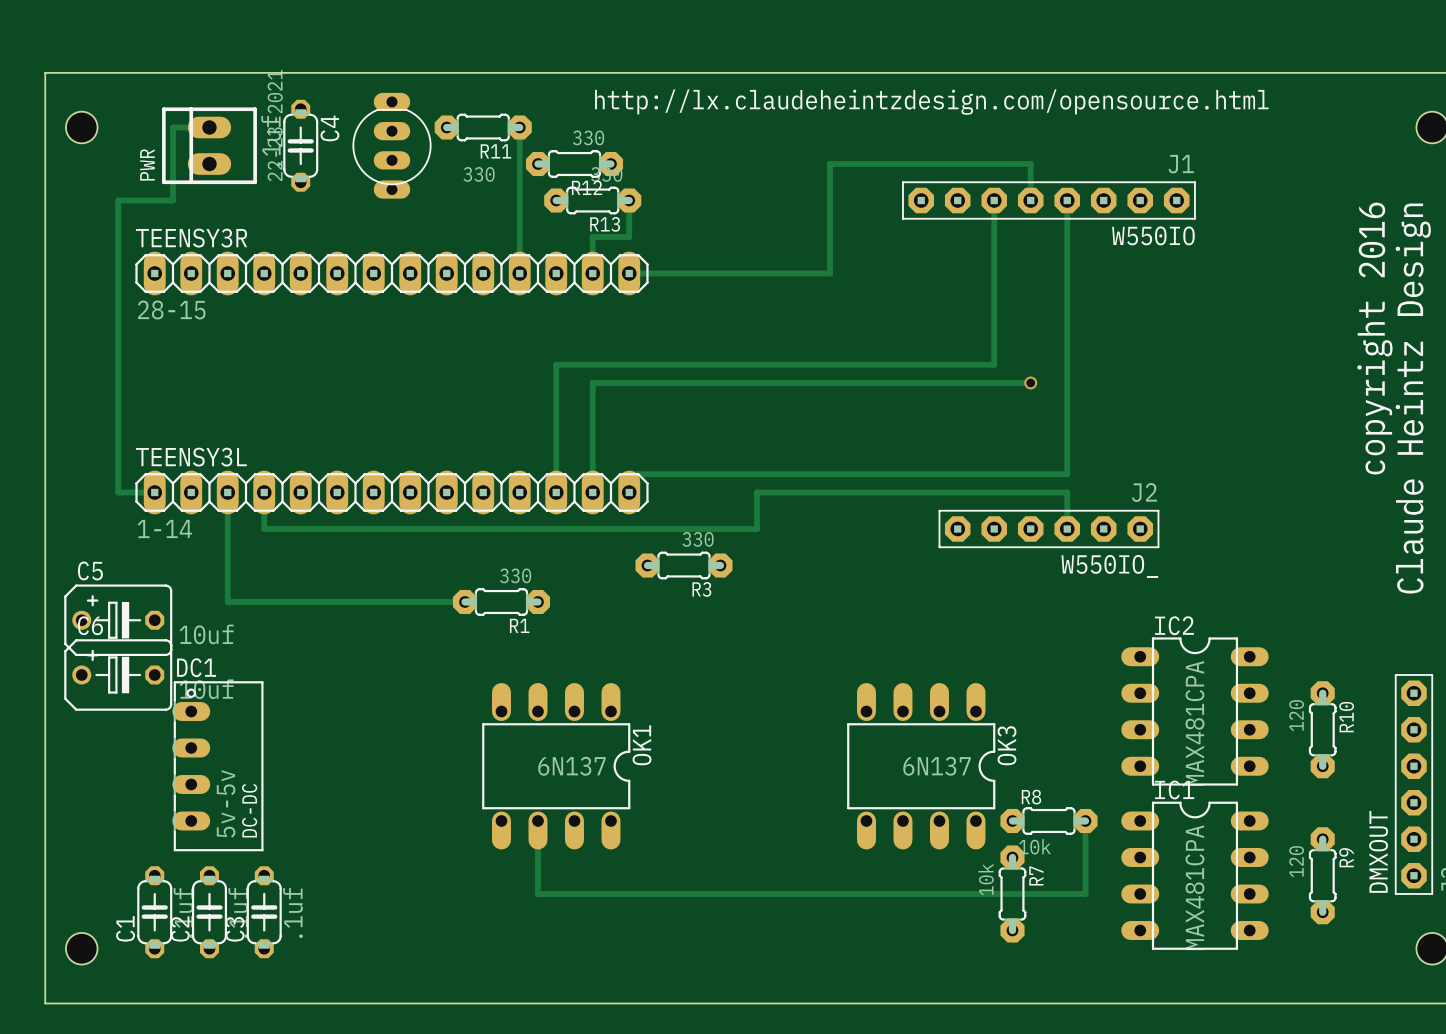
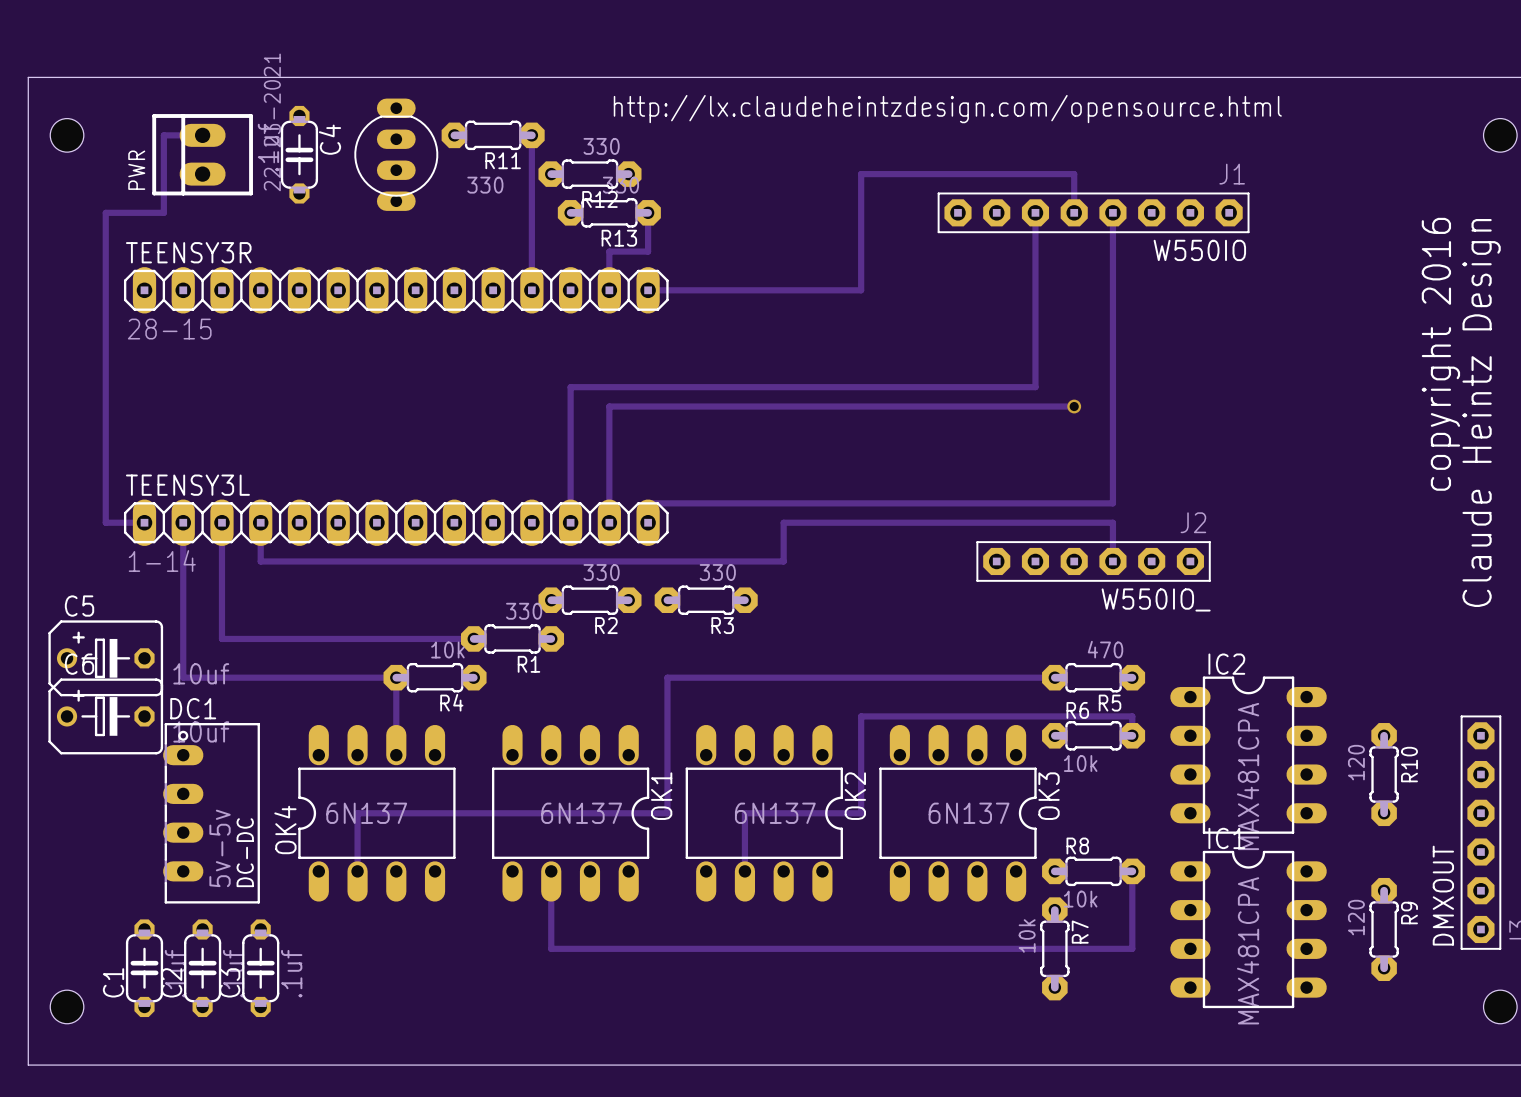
track: none -> (183, 522) (183, 677) (396, 677) (396, 755)
R2: none -> 330 (589, 600)
R4: none -> 10k (435, 677)
track: none -> (1054, 677) (667, 677) (667, 813) (357, 813) (357, 871)
R5: none -> 470 (1093, 677)
R6: none -> 10k (1093, 735)
track: none -> (1132, 735) (1132, 716) (861, 716) (861, 813) (744, 813) (744, 871)
OK4: none -> 6N137 (376, 813)
OK2: none -> 6N137 (764, 813)

